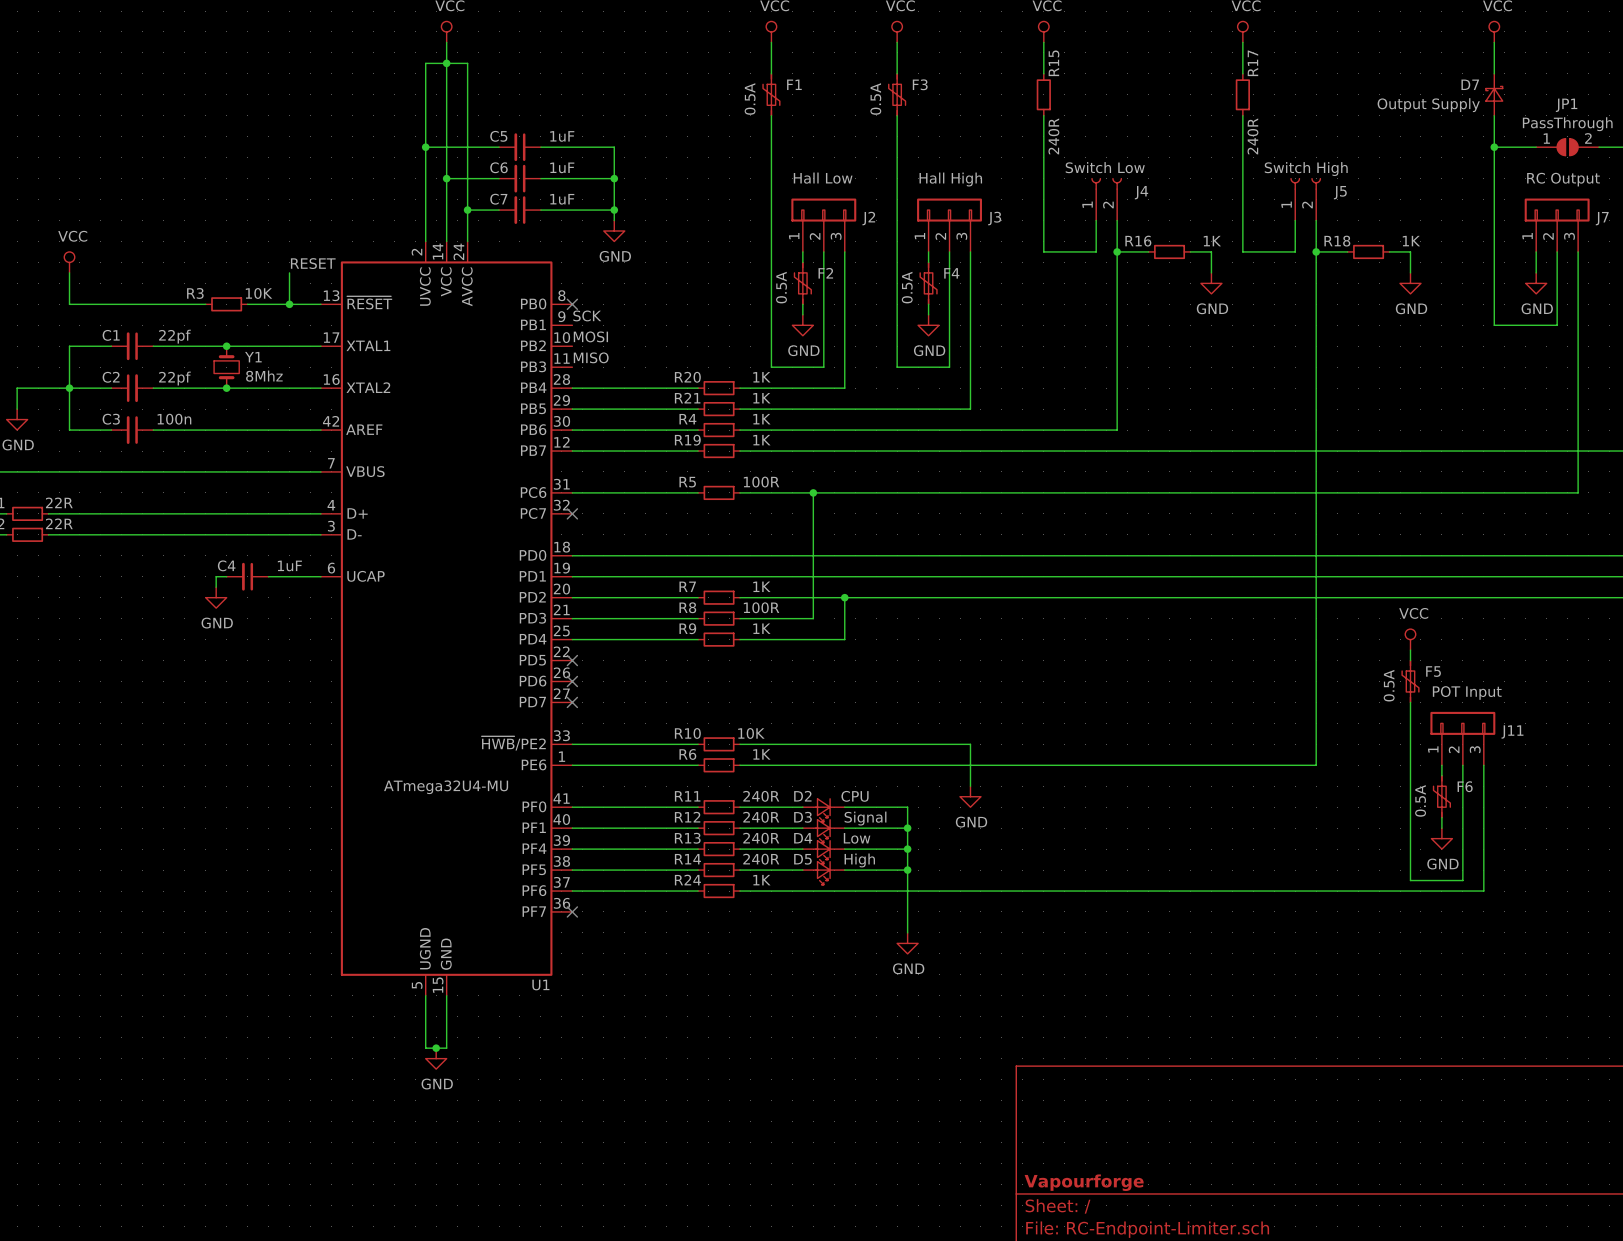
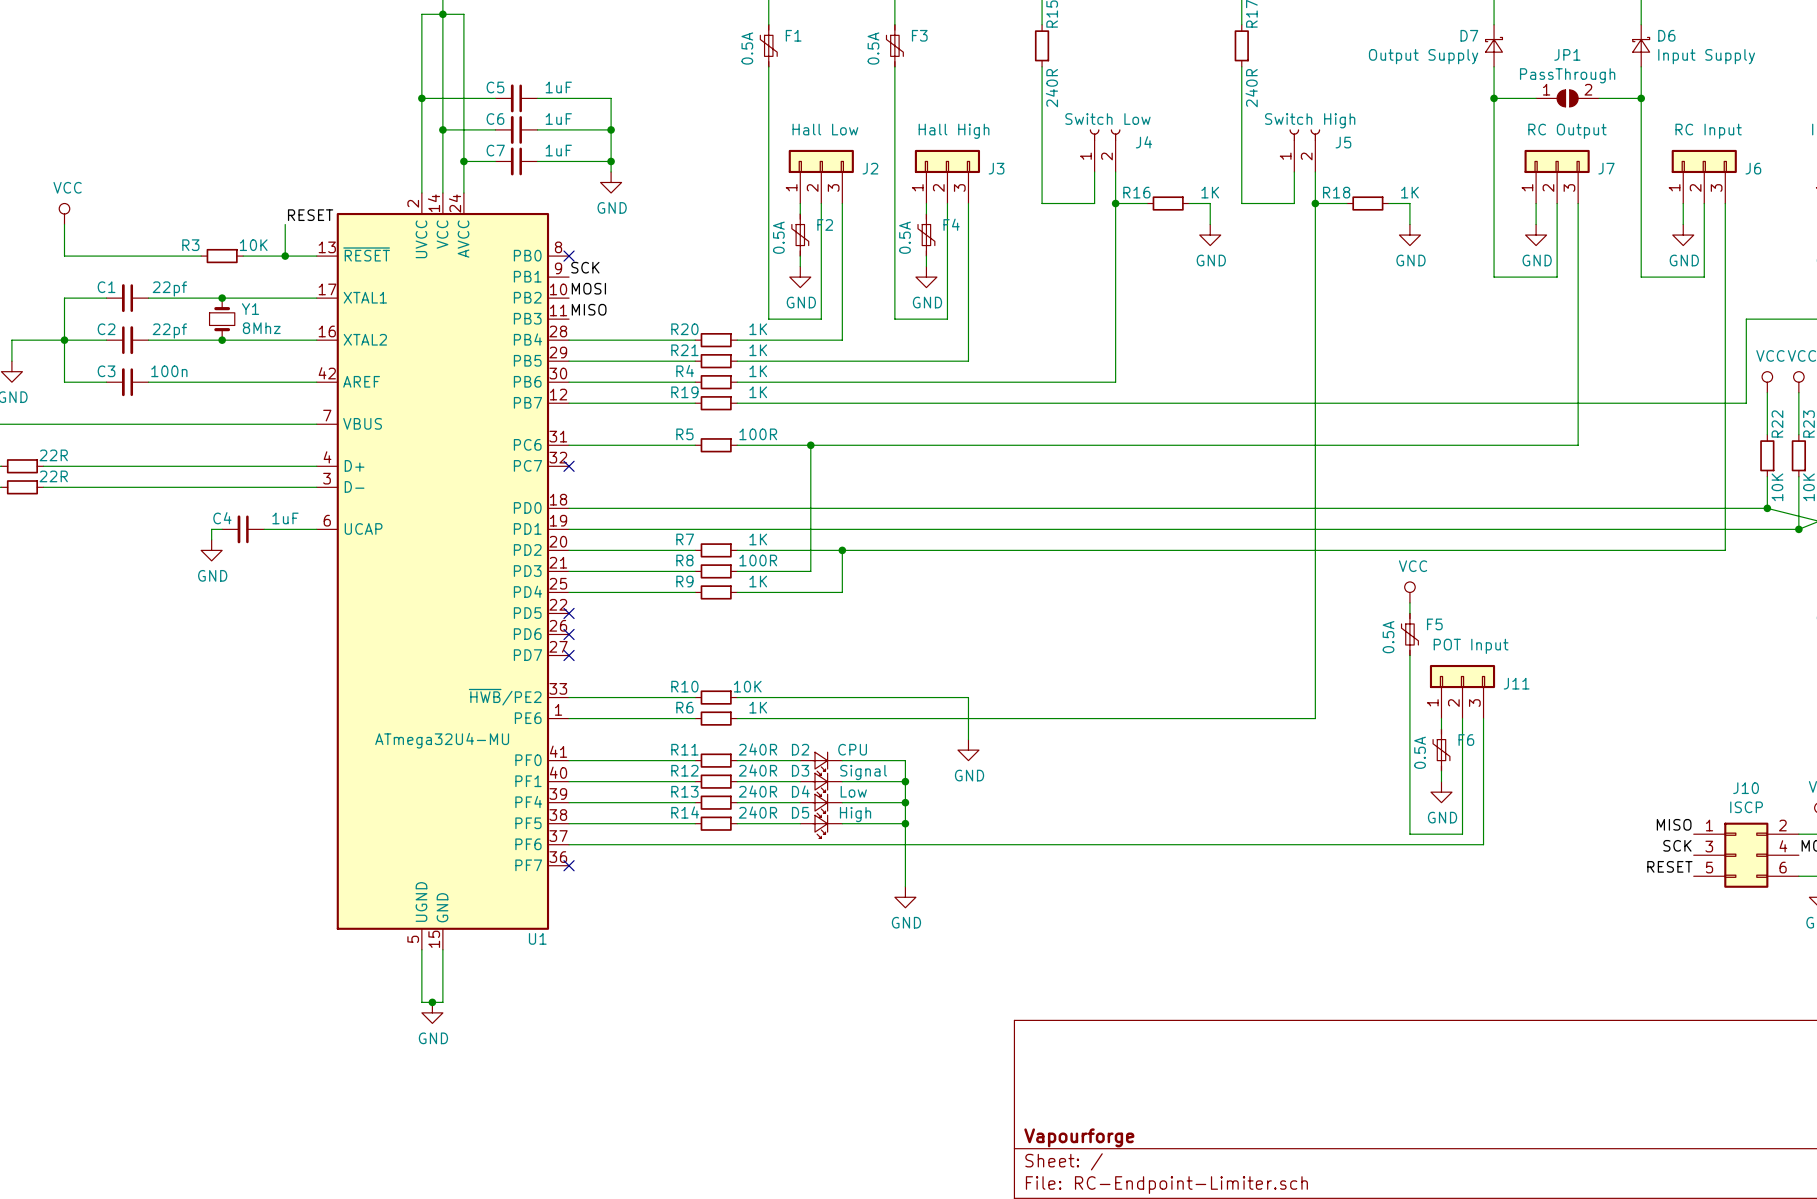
wire: none -> (695, 844) (737, 844)
R24: 1K (719, 891) -> none

